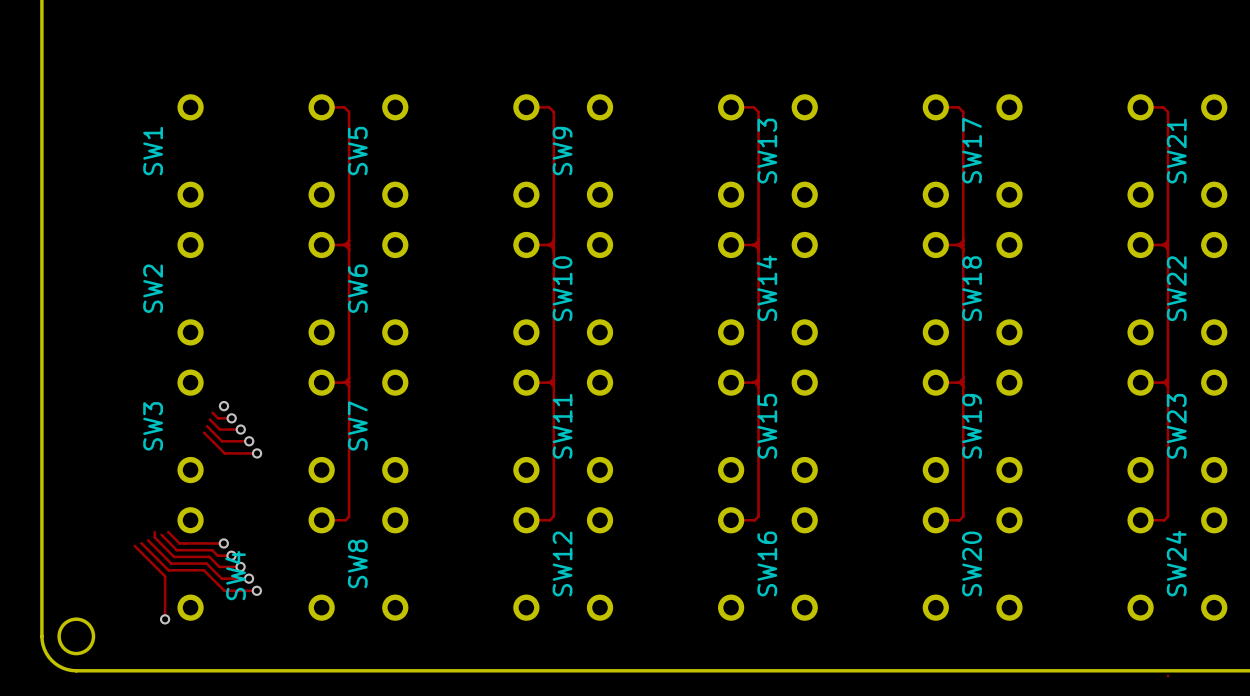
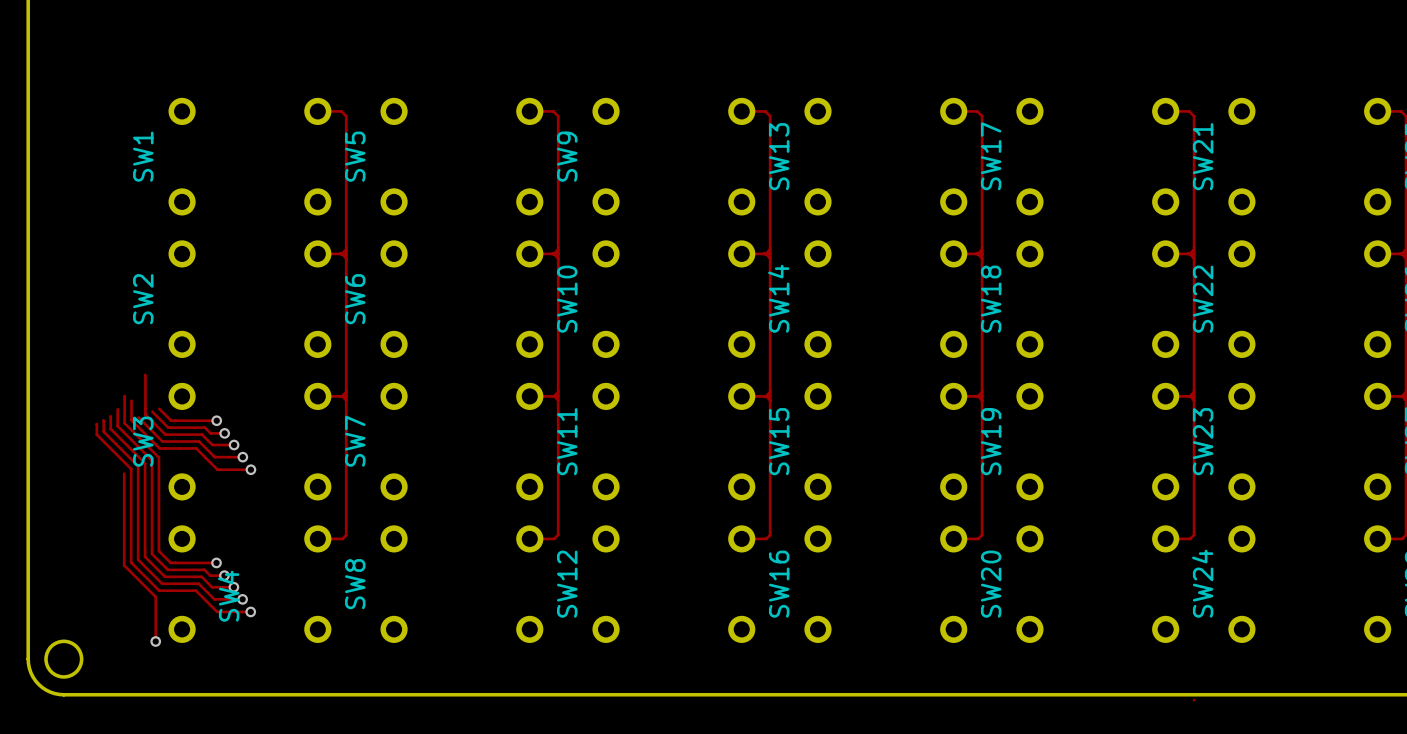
track: none -> (145, 374) (145, 414) (165, 434) (202, 434)
track: none -> (124, 396) (124, 423) (158, 457) (158, 551)
track: none -> (131, 400) (131, 420) (159, 448) (196, 448)
track: none -> (159, 408) (171, 420) (176, 420)
track: none -> (117, 409) (117, 426) (151, 460) (151, 553)
track: none -> (152, 411) (168, 427) (204, 427)
track: none -> (110, 416) (110, 428) (145, 463) (145, 551)
track: none -> (138, 417) (162, 441) (199, 441)
track: none -> (103, 420) (103, 431) (138, 466) (138, 559)
track: none -> (176, 420) (216, 420)
track: none -> (96, 424) (96, 434) (131, 469) (131, 562)
track: none -> (124, 473) (124, 565)

